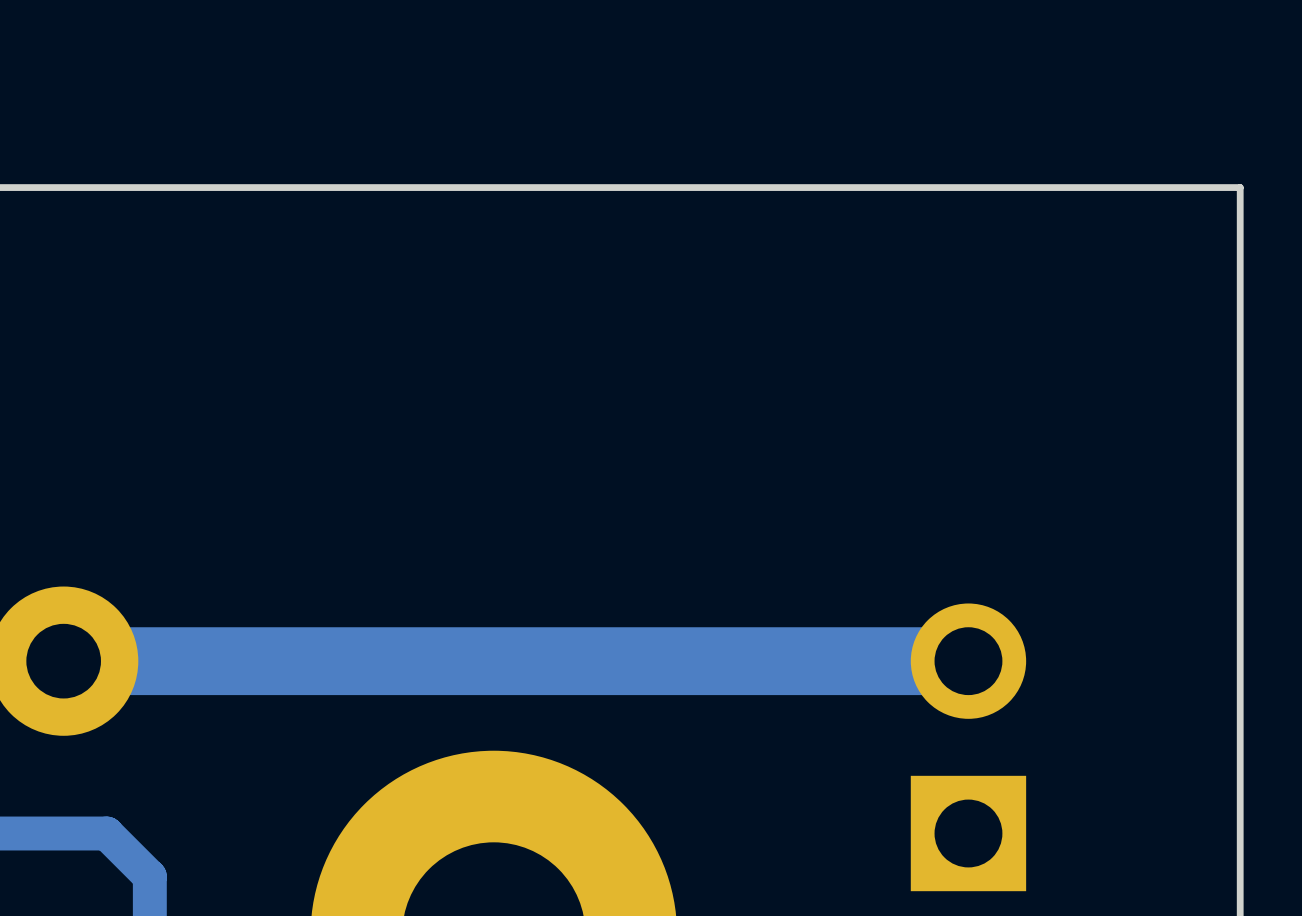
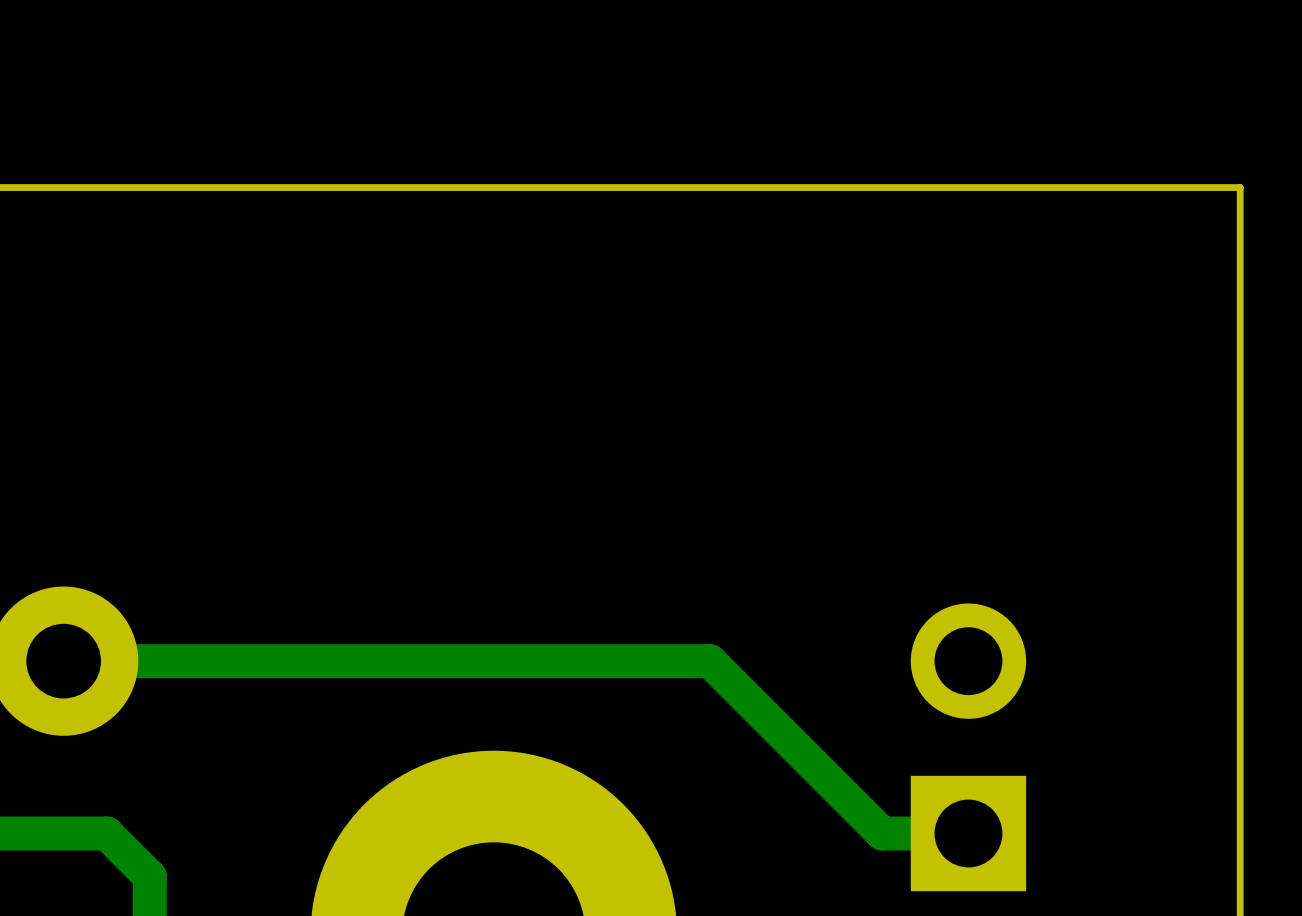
track width: thick (709, 661) (63, 661) -> thin (709, 661) (63, 661)
track: (968, 661) (709, 661) -> (968, 833) (882, 833) (709, 661)

